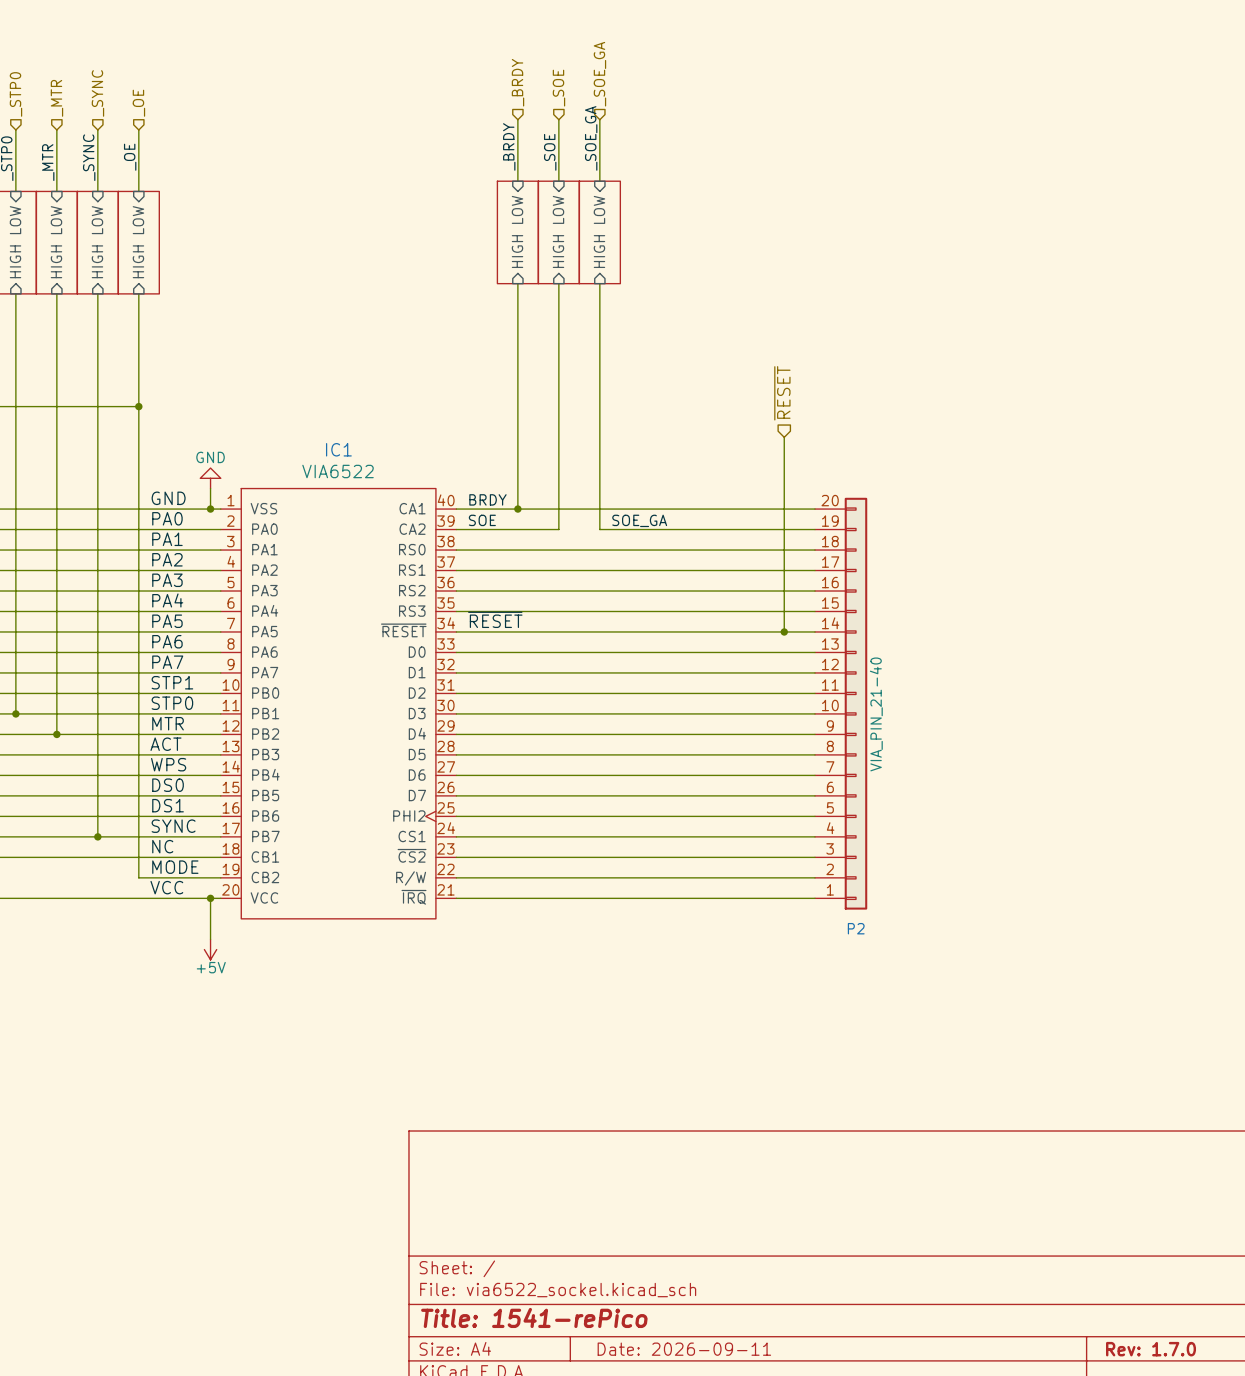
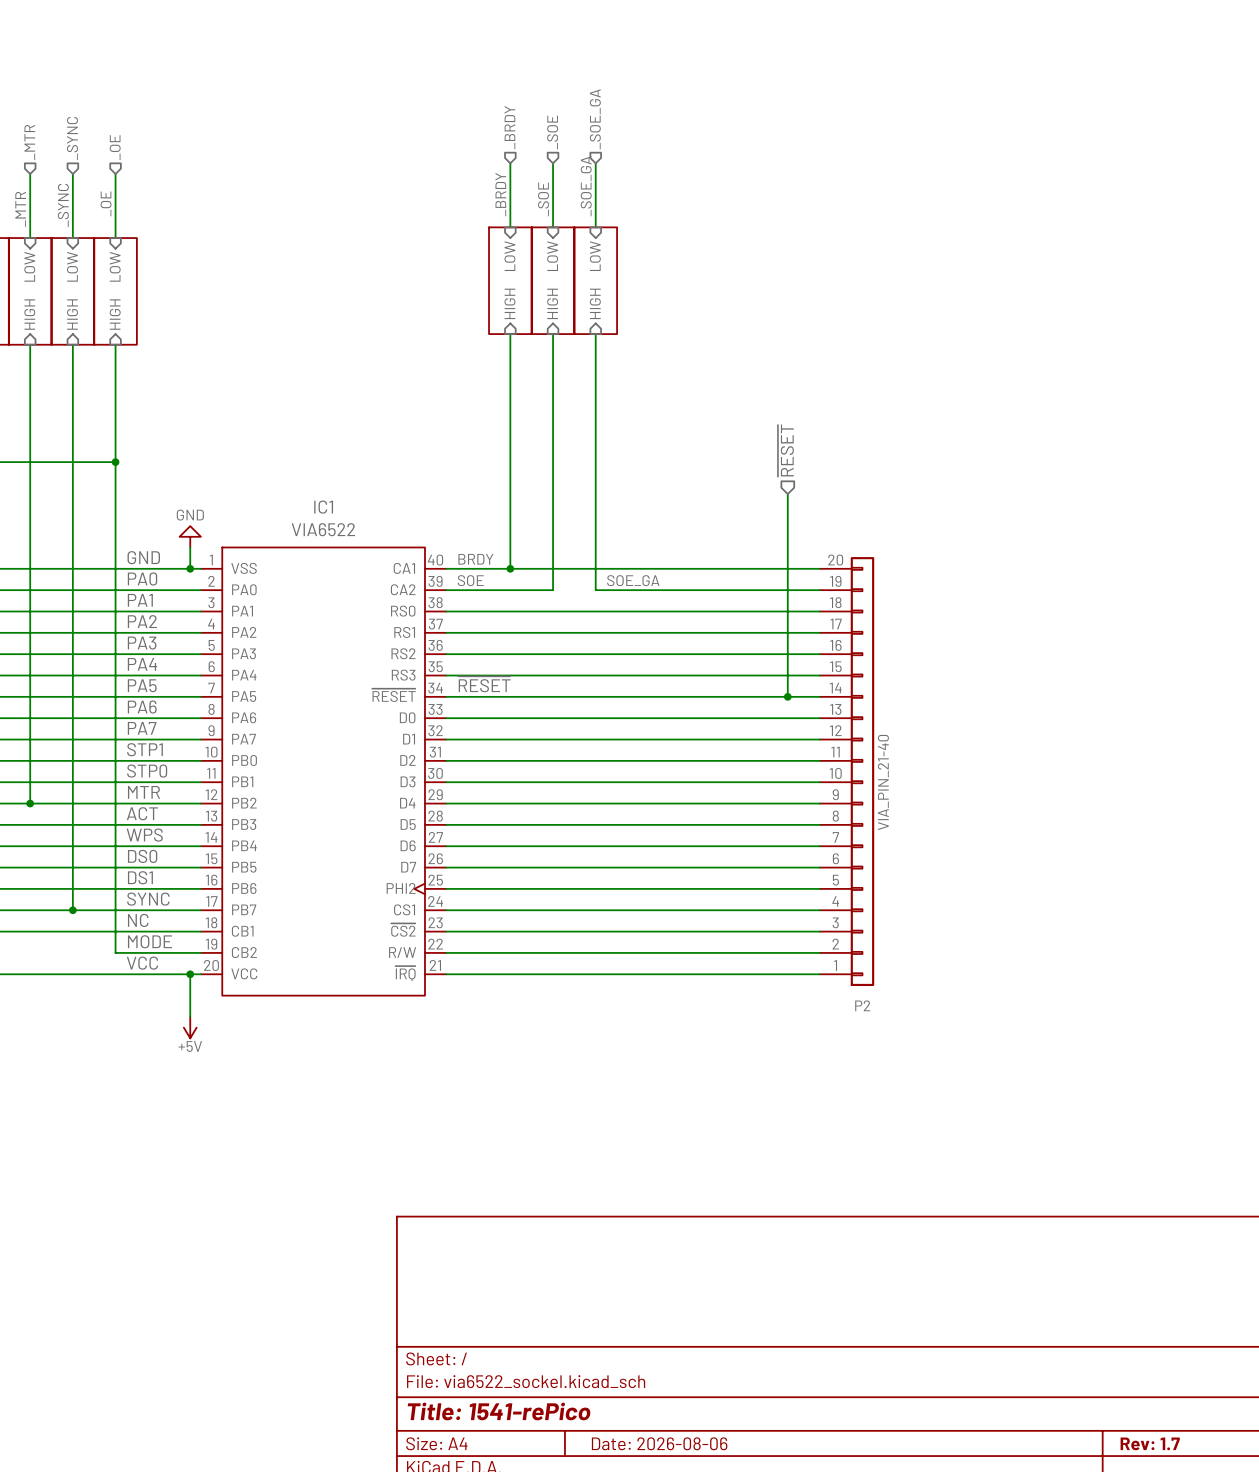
title block: Date: 2026-09-11 (684, 1349) -> Date: 2026-08-06 (659, 1443)
title block: Rev: 1.7.0 (1151, 1349) -> Rev: 1.7 (1150, 1443)

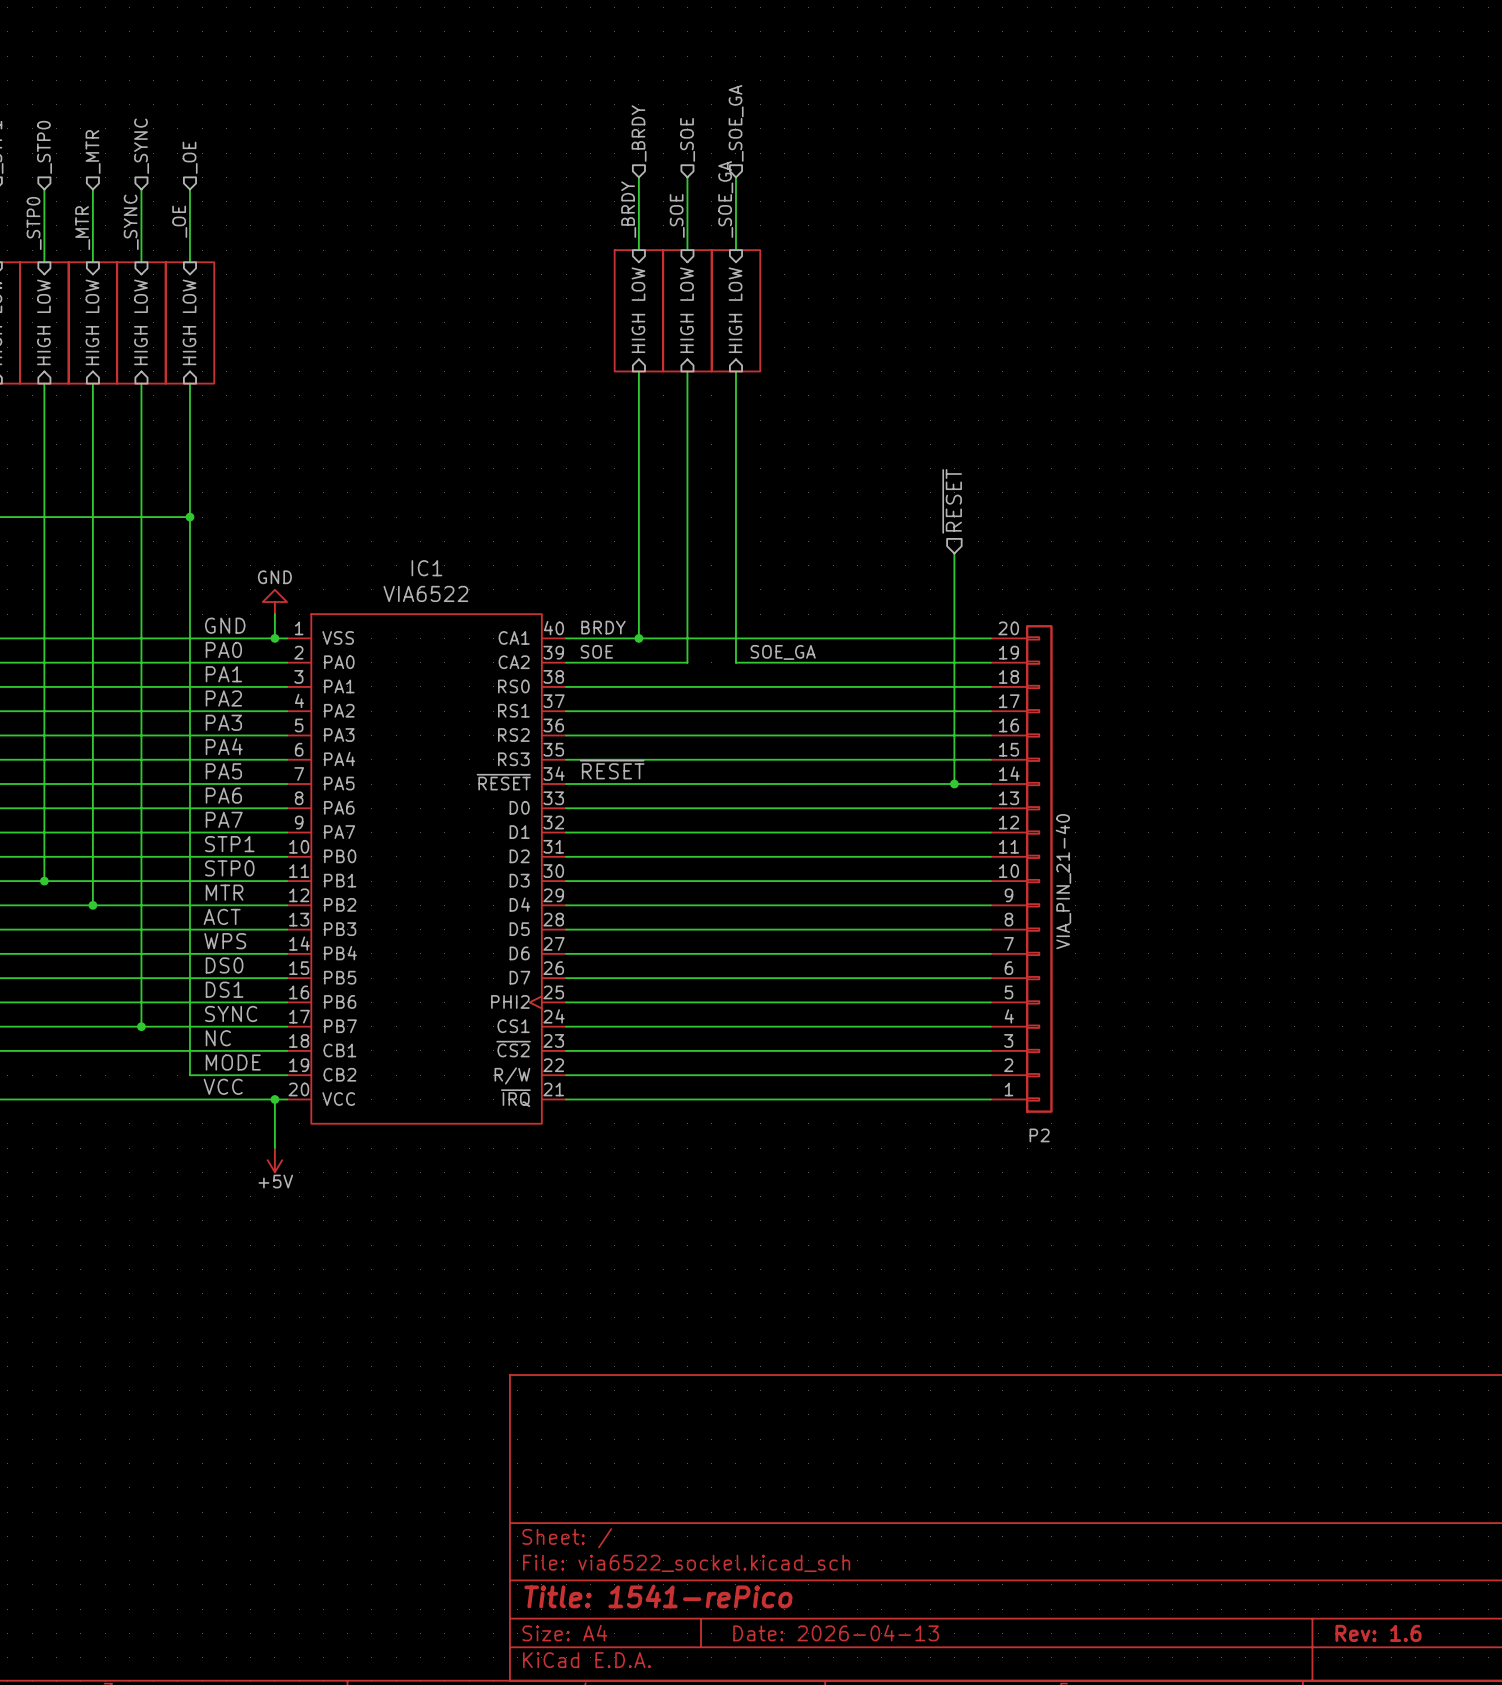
title block: Date: 2026-08-06 (659, 1443) -> Date: 2026-04-13 (836, 1633)
title block: Rev: 1.7 (1150, 1443) -> Rev: 1.6 (1378, 1633)

